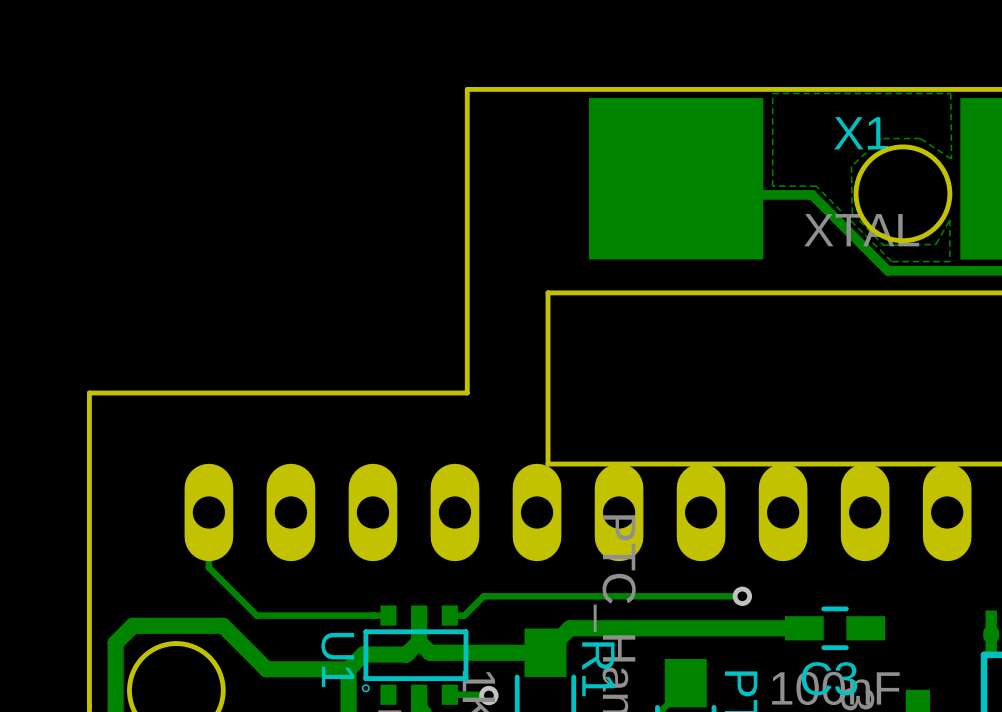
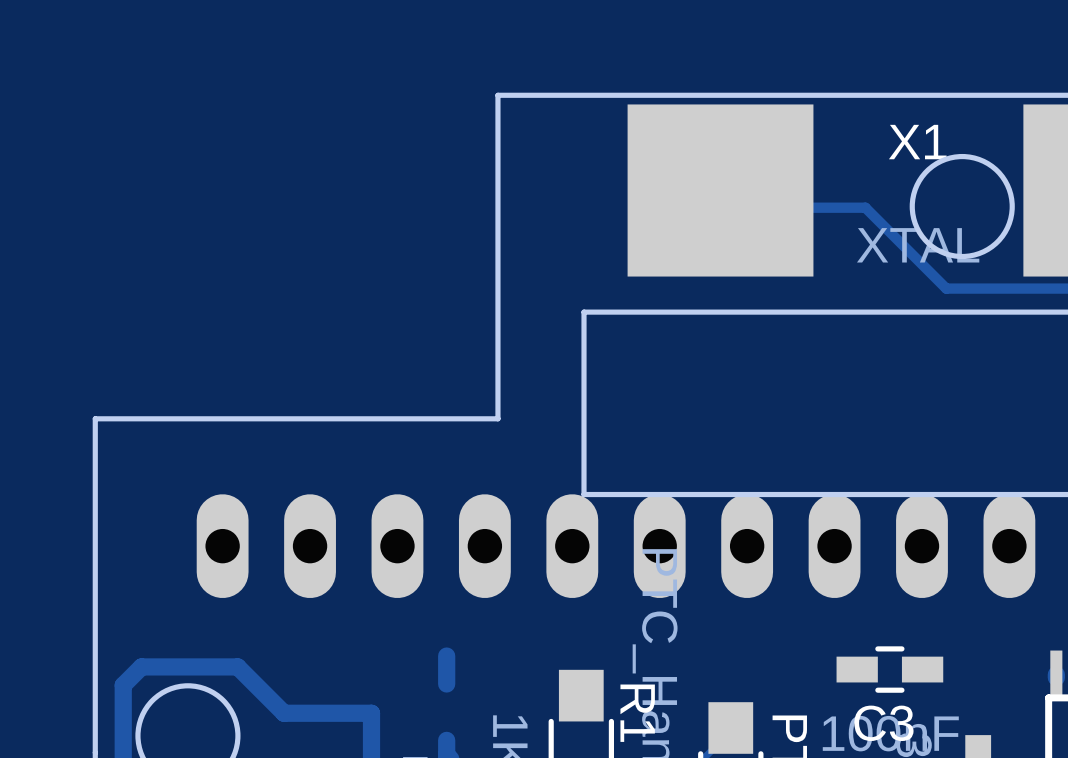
zone outline: (950, 93) (772, 93) (772, 186) (816, 186) (891, 261) (949, 261) (949, 219) (935, 244) (883, 245) (852, 213) (851, 166) (880, 138) (920, 138) (951, 159) (950, 93) -> none
track: (208, 512) (208, 567) (256, 615) (388, 615) -> none
track: (742, 596) (483, 596) (464, 615) (449, 615) -> none
via: (742, 596) -> none
track: (804, 628) (569, 628) (545, 652) (430, 652) (419, 641) (406, 654) (363, 654) (348, 669) -> none
U1: (415, 655) -> none
track: (449, 694) (488, 695) -> none
via: (488, 695) -> none

